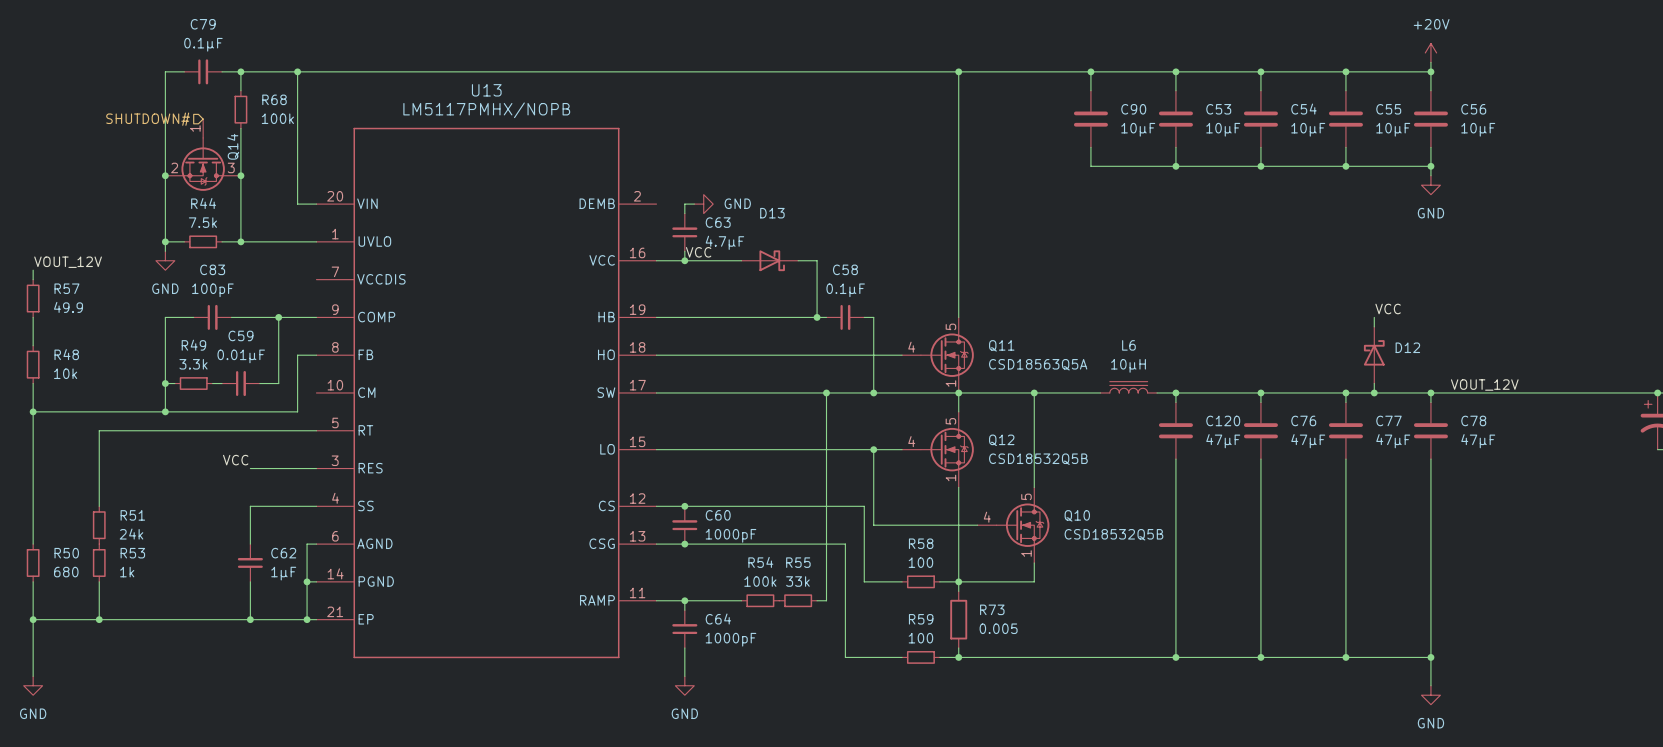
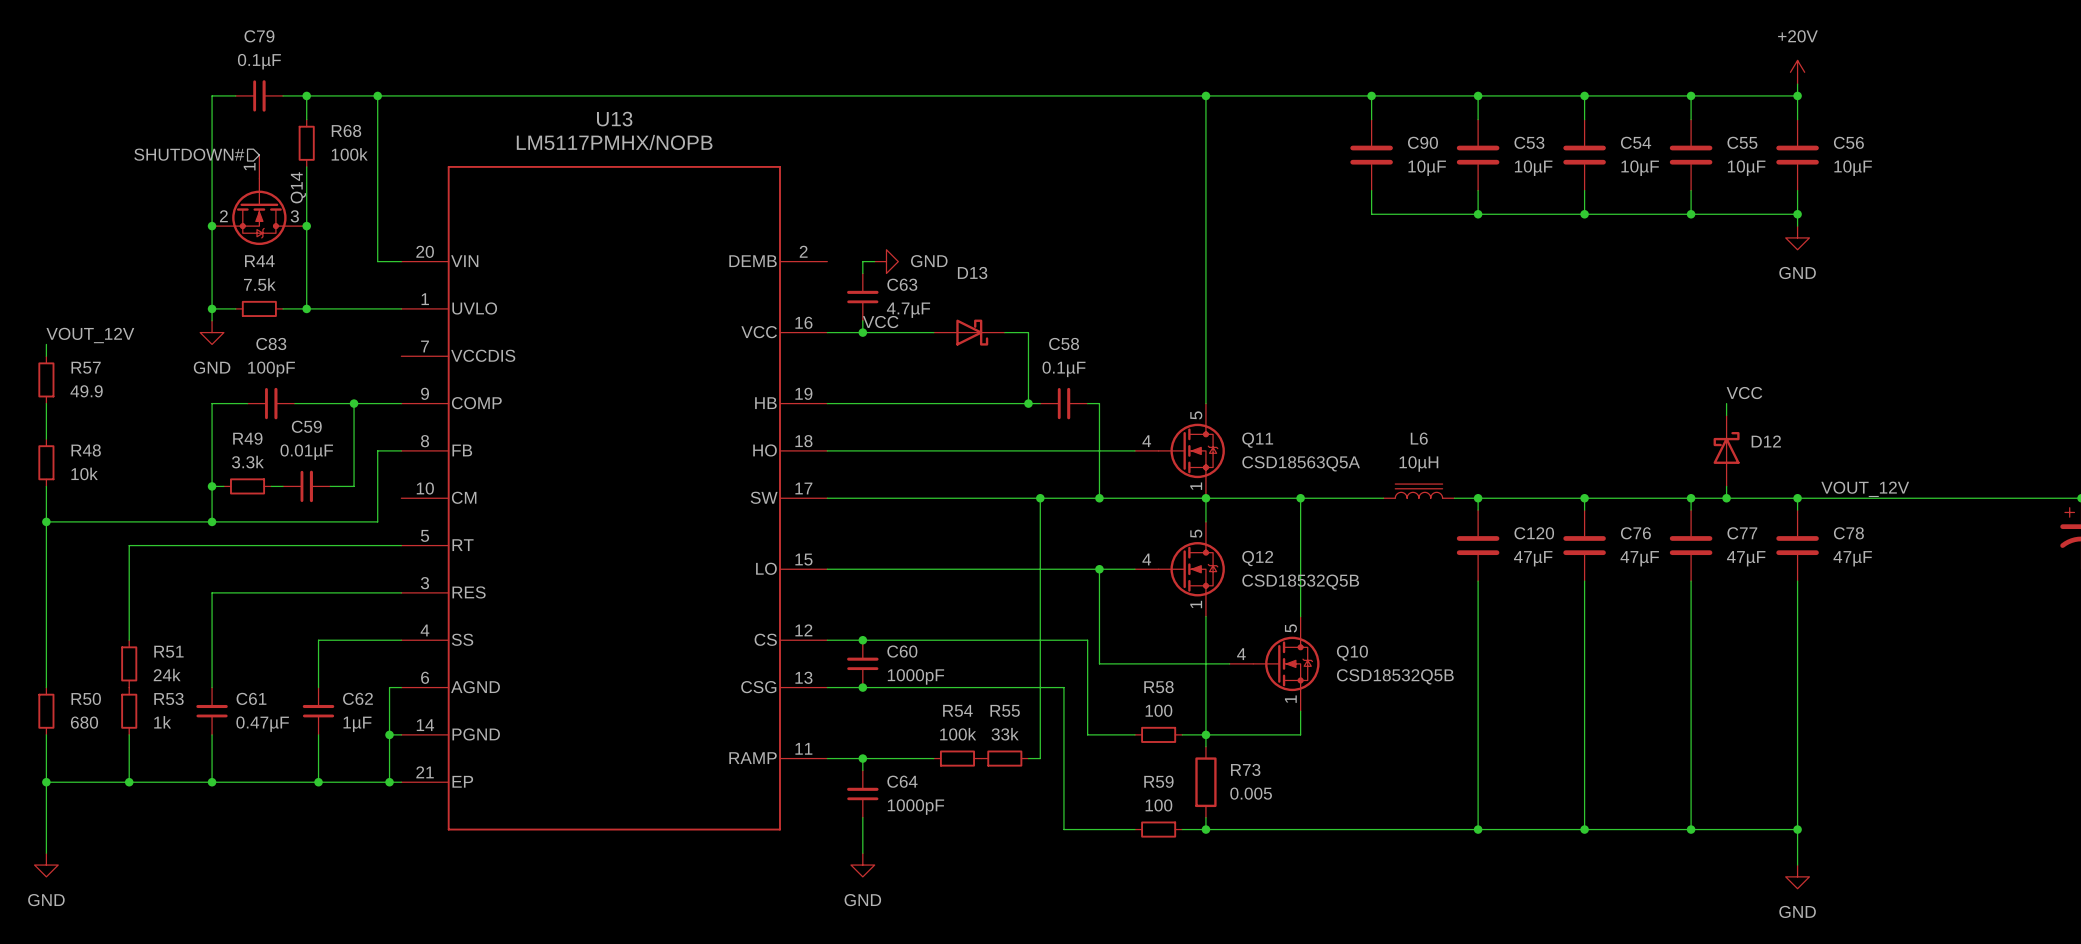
label: VCC (235, 460) -> none
wire: none -> (318, 592) (212, 592) (212, 687)
C61: none -> 0.47µF (212, 711)
wire: none -> (212, 734) (212, 782)
junction: none -> (212, 782)

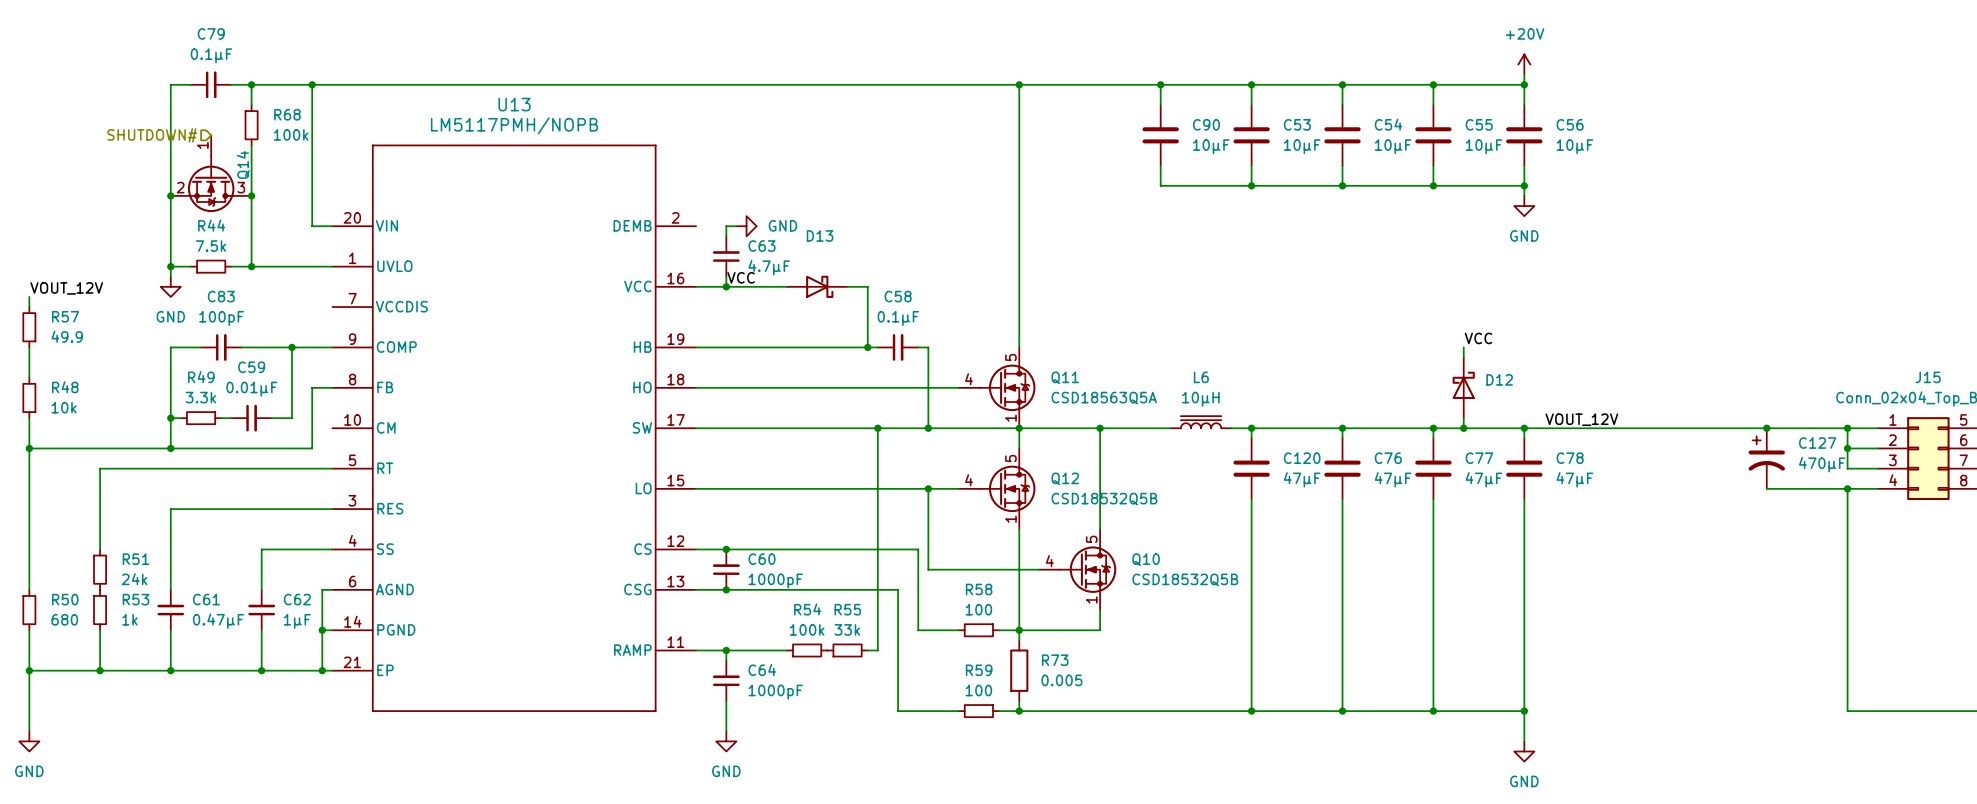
U13 value: LM5117PMHX/NOPB (614, 142) -> LM5117PMH/NOPB (514, 125)

